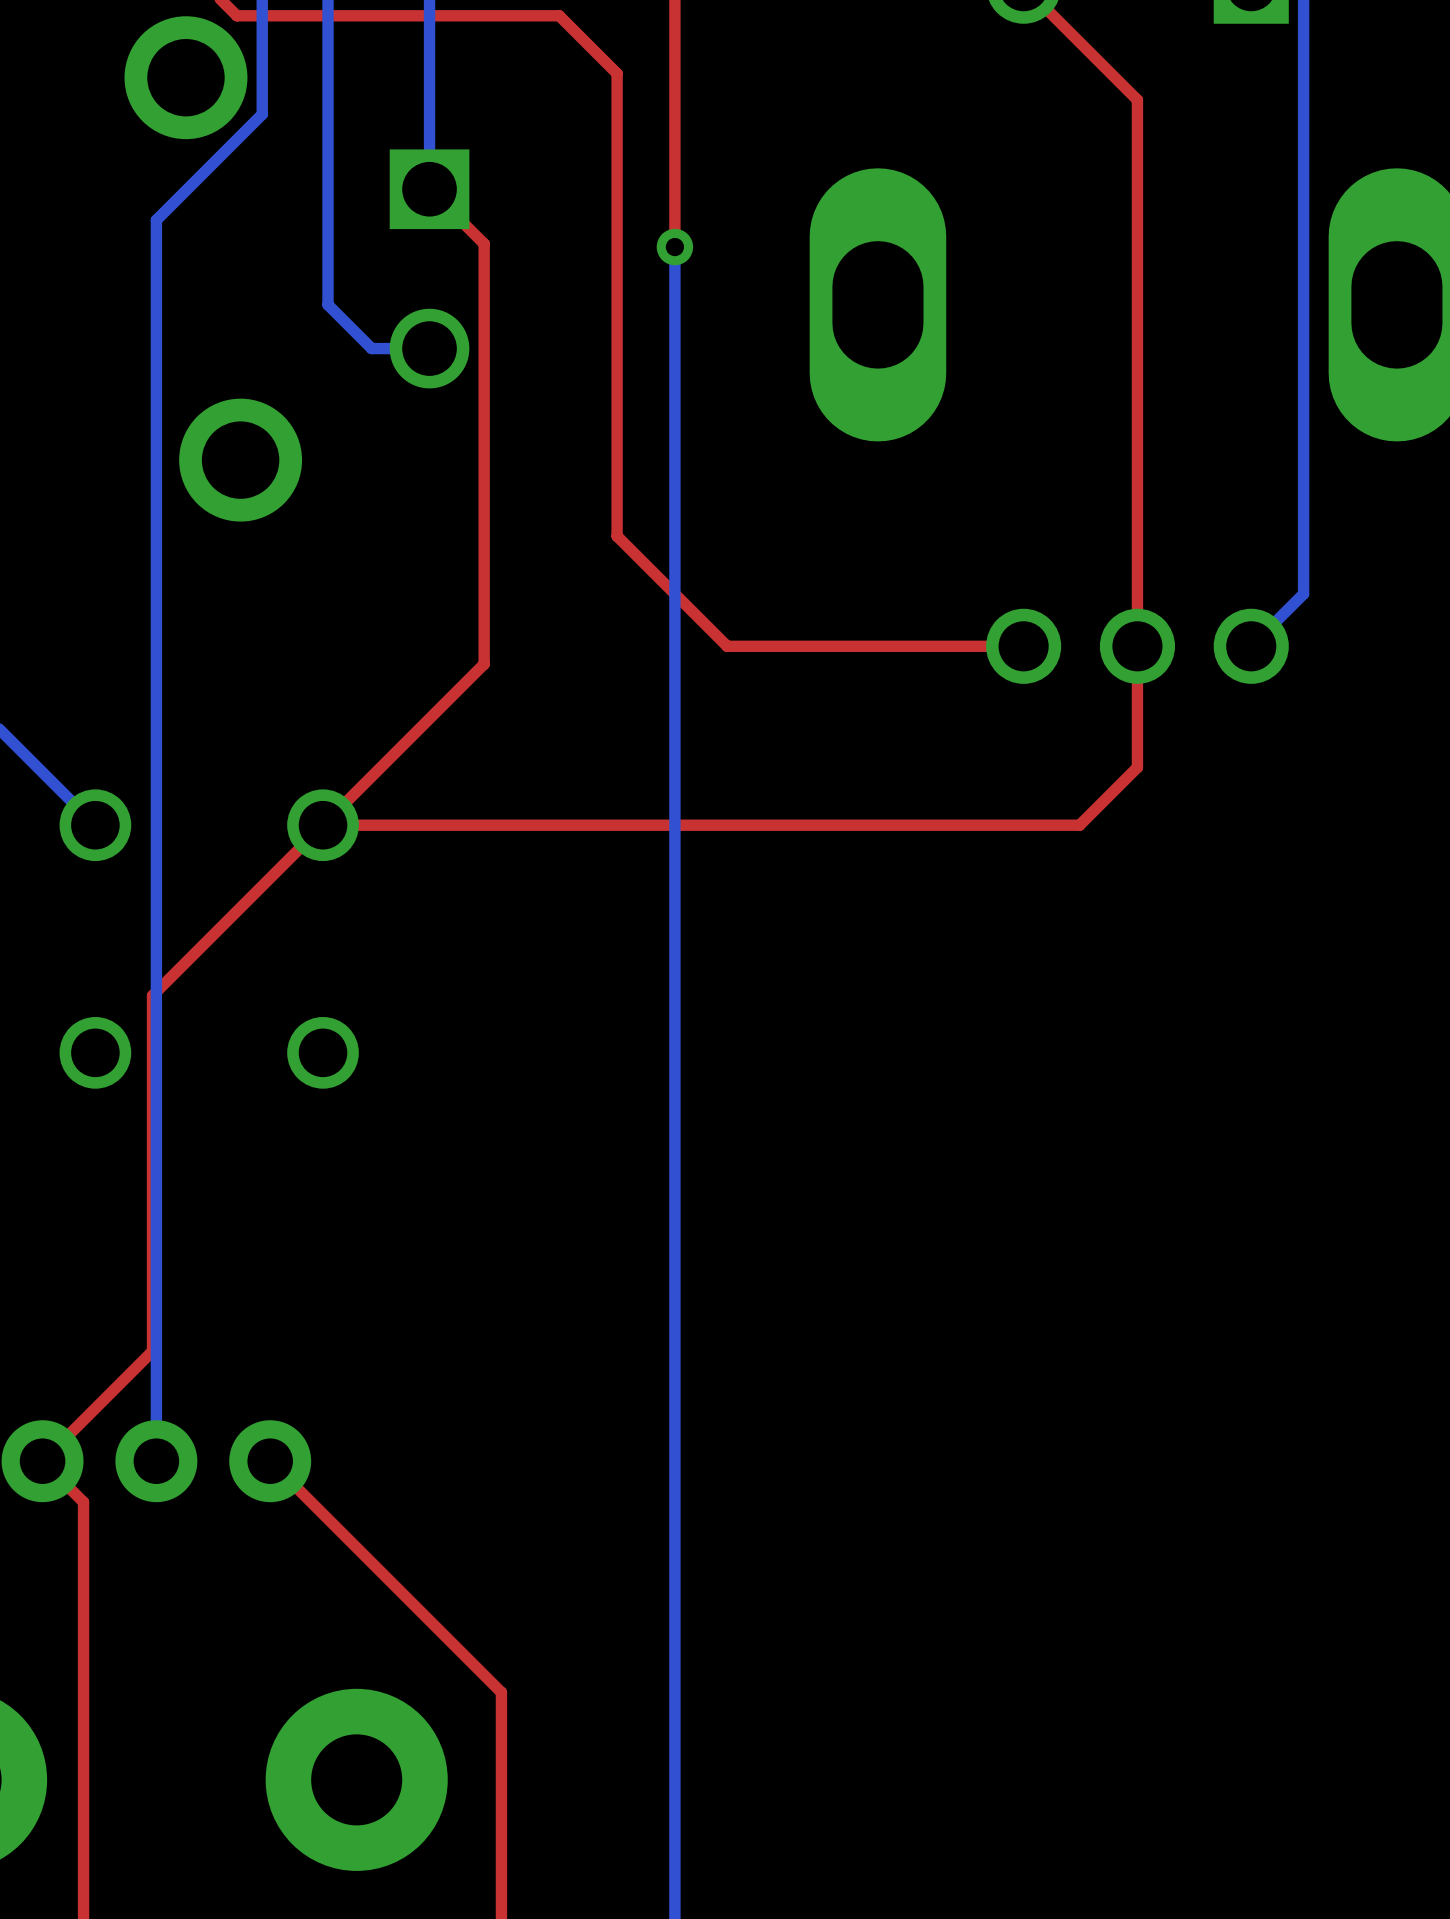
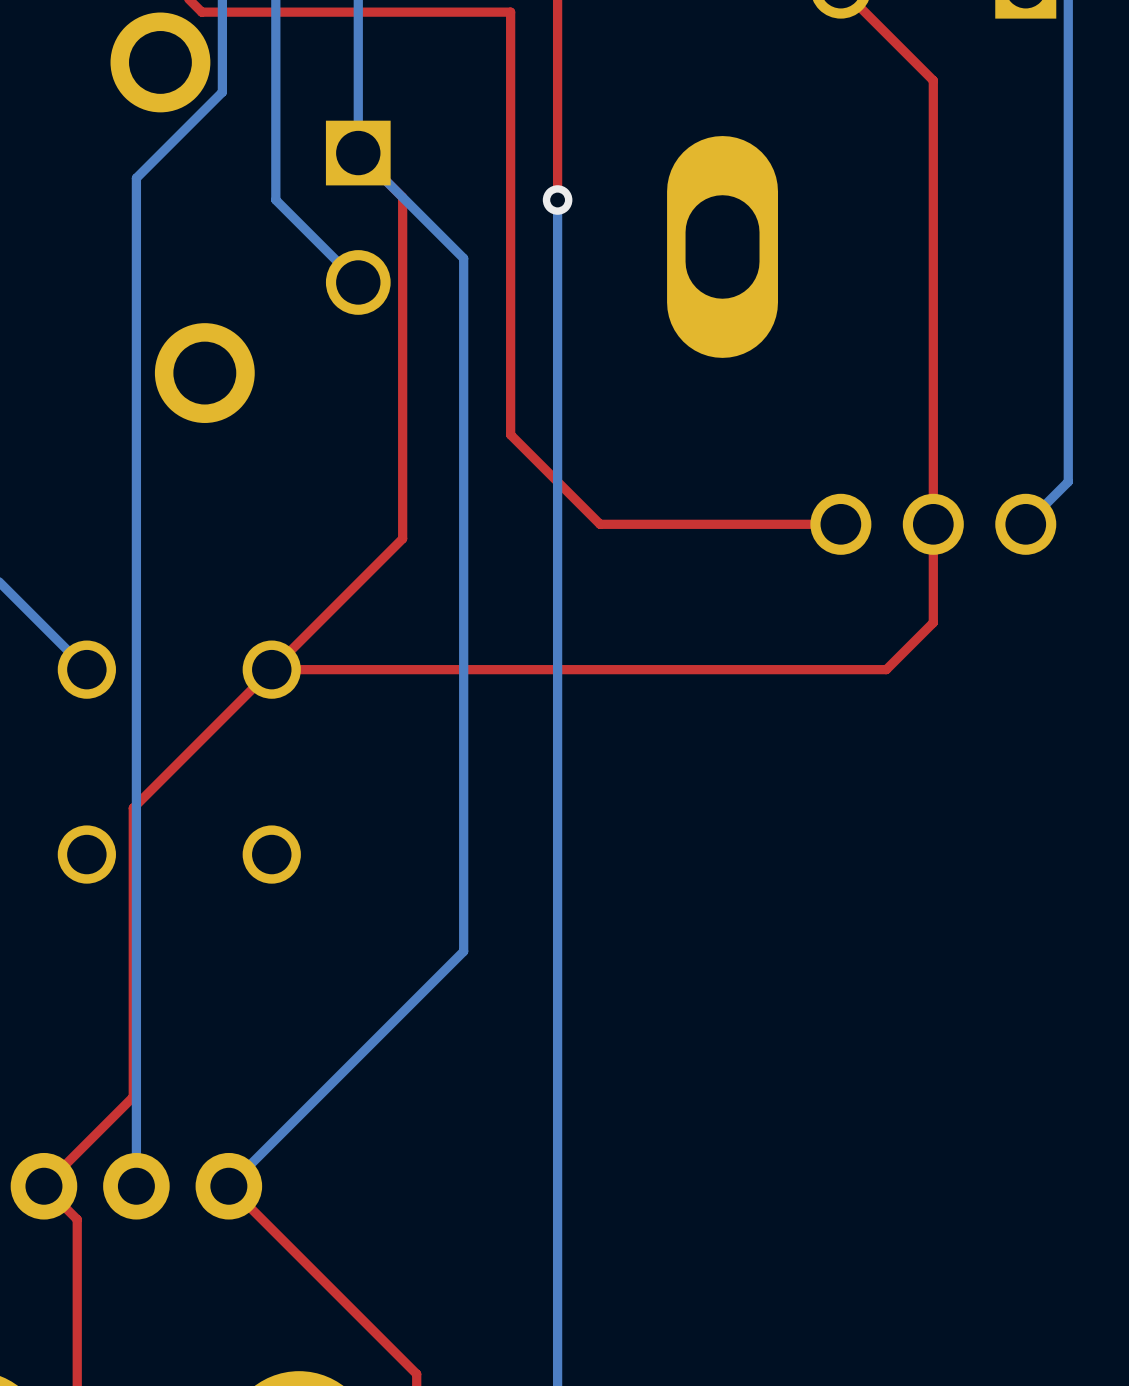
top track: (559, 15) (617, 73) -> (463, 12) (510, 12) (510, 59)
bottom track: none -> (358, 153) (463, 258) (463, 951) (228, 1186)
bottom track: (328, 247) (328, 304) (371, 348) (429, 348) -> (275, 200) (358, 282)

